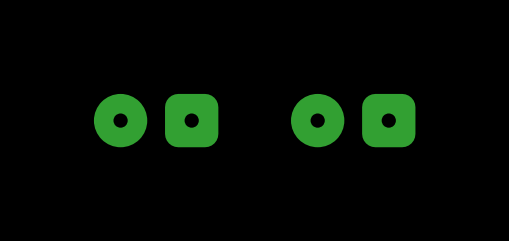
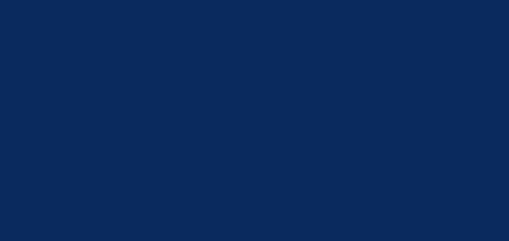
part: (156, 120) -> none
part: (353, 120) -> none

